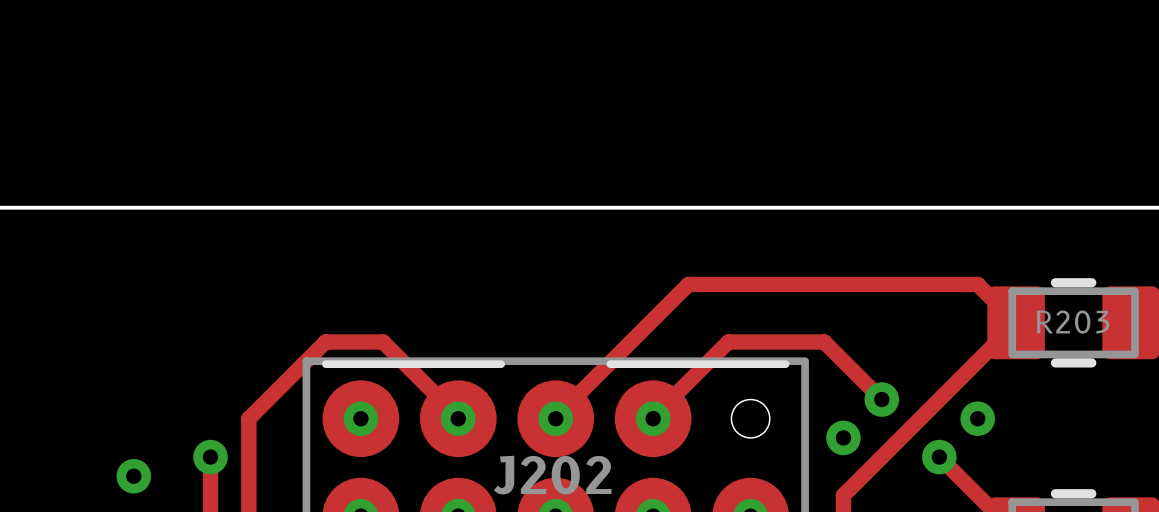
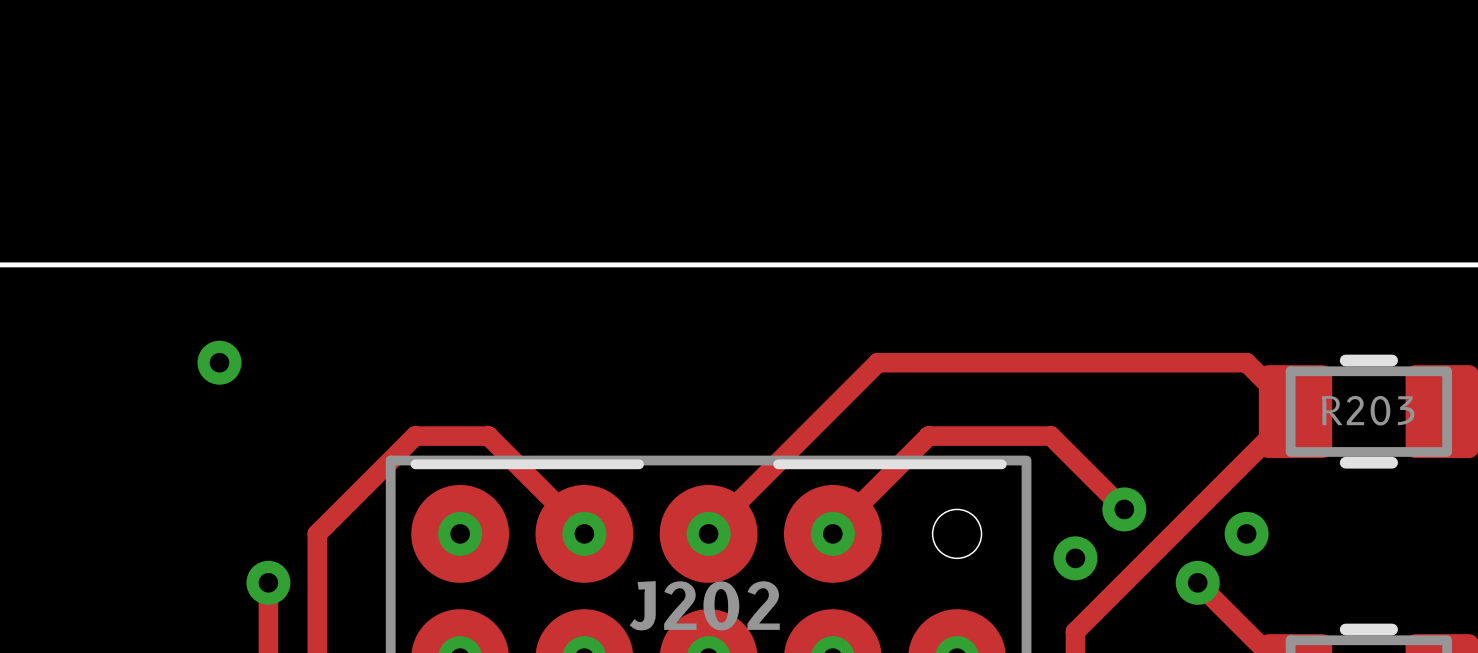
via: none -> (219, 362)
via: (133, 476) -> none

